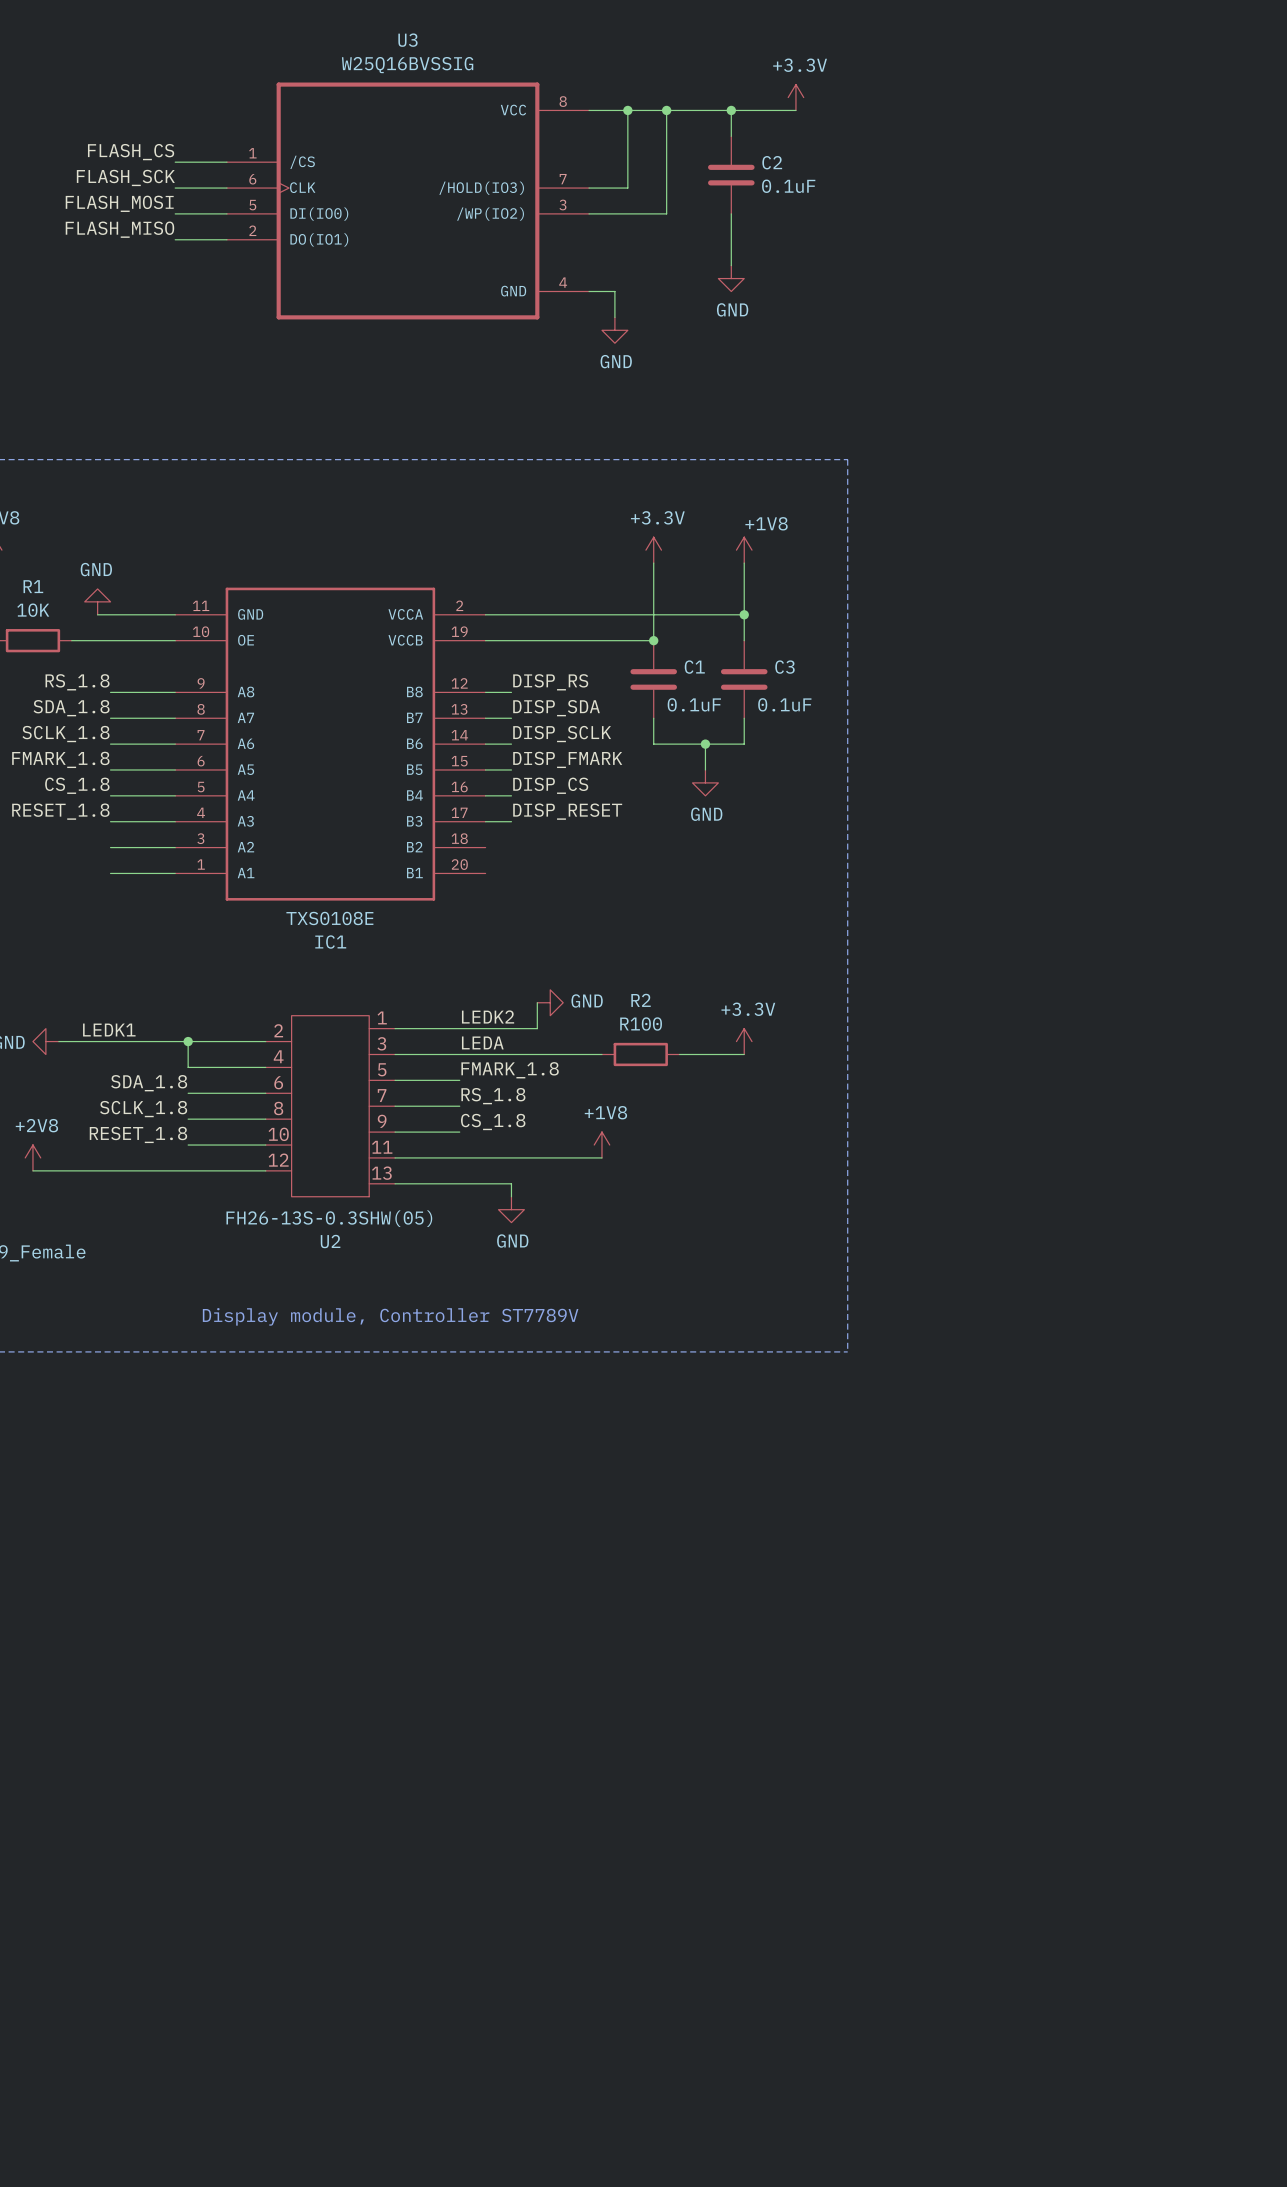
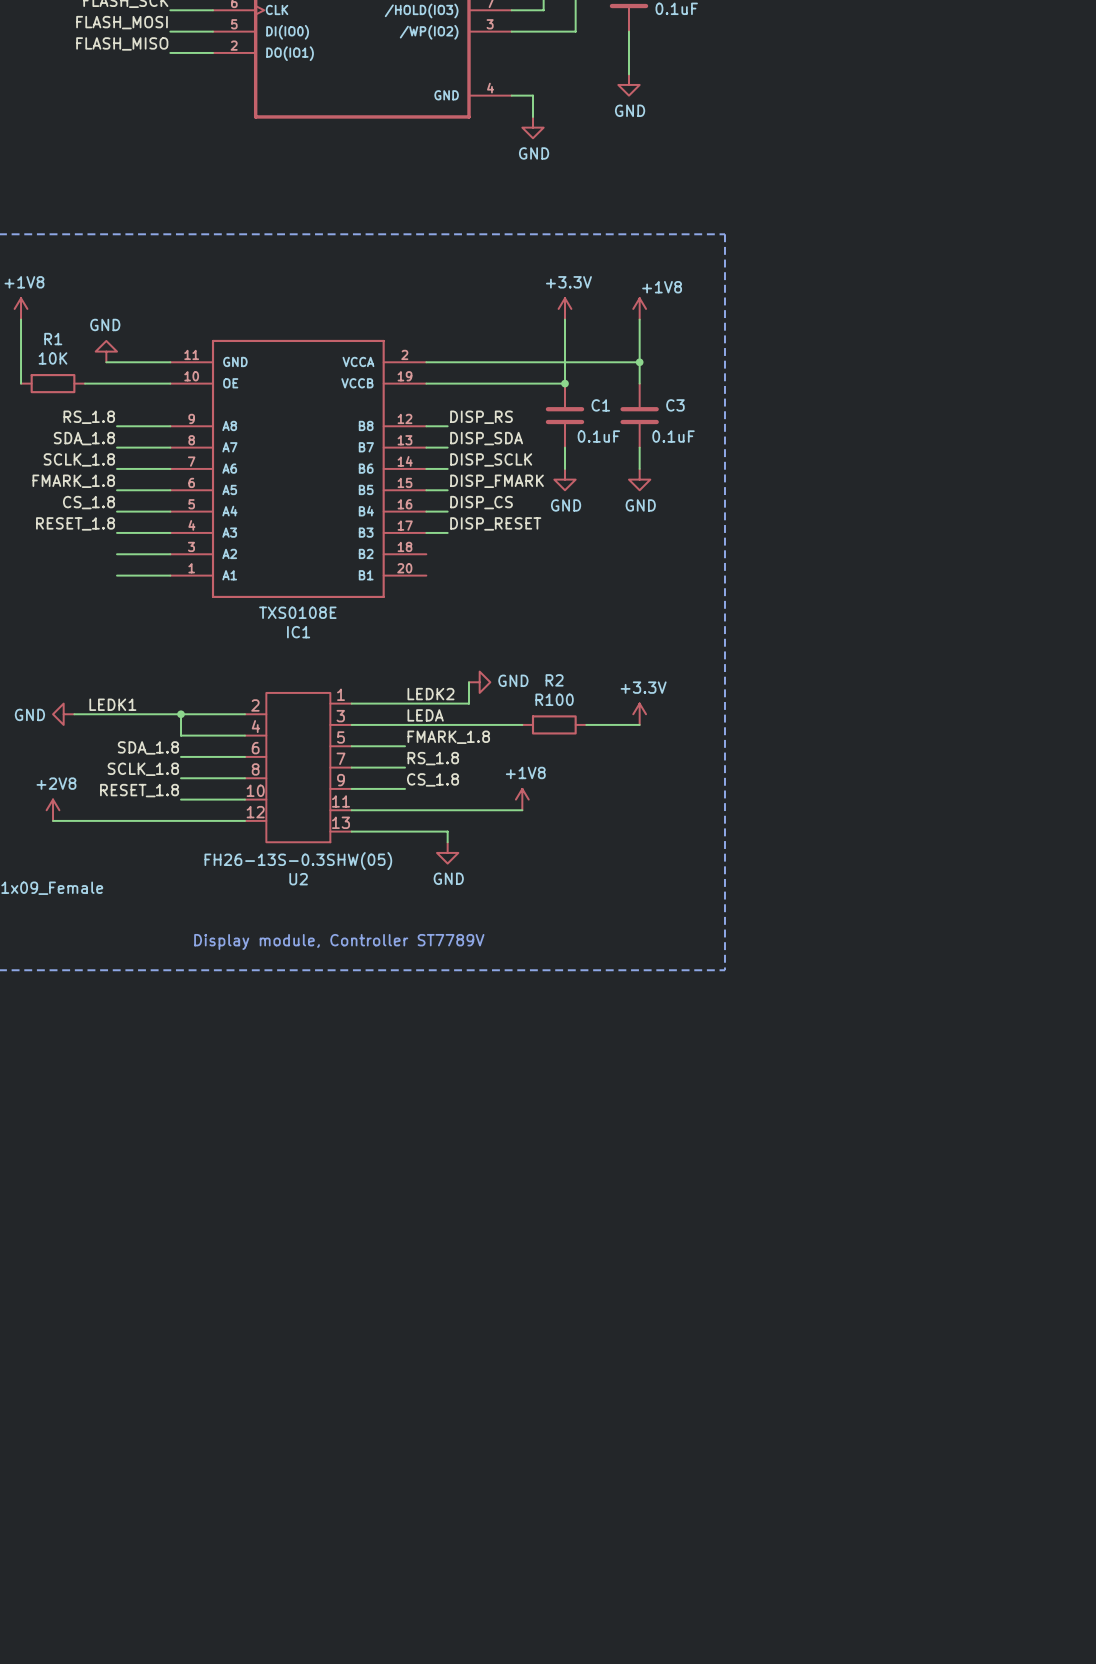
wire: (653, 744) (744, 744) -> none
wire: (705, 744) (705, 769) -> none
junction: (705, 744) -> none
power symbol: none -> GND (565, 479)
power symbol: none -> GND (639, 479)
power symbol: GND (705, 782) -> none

